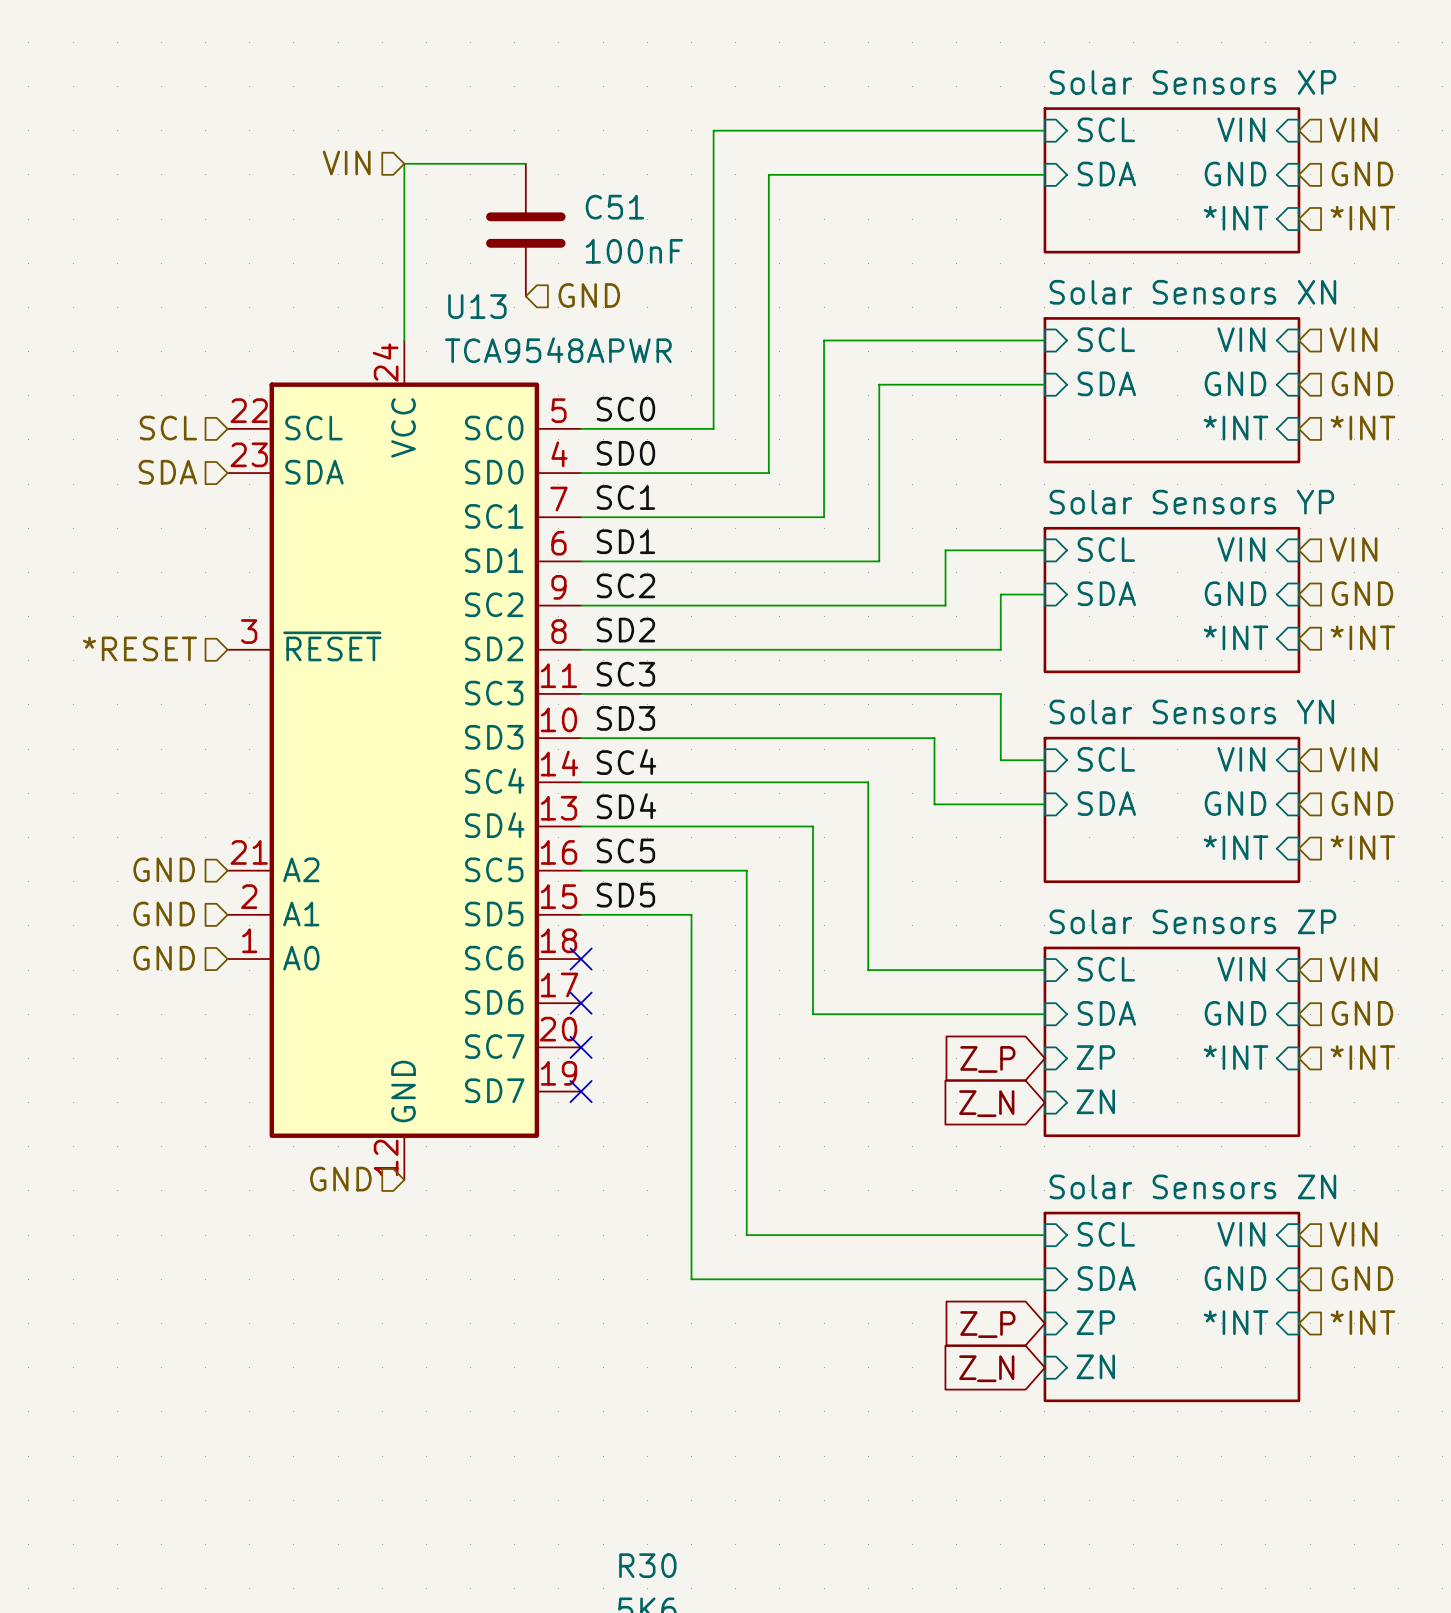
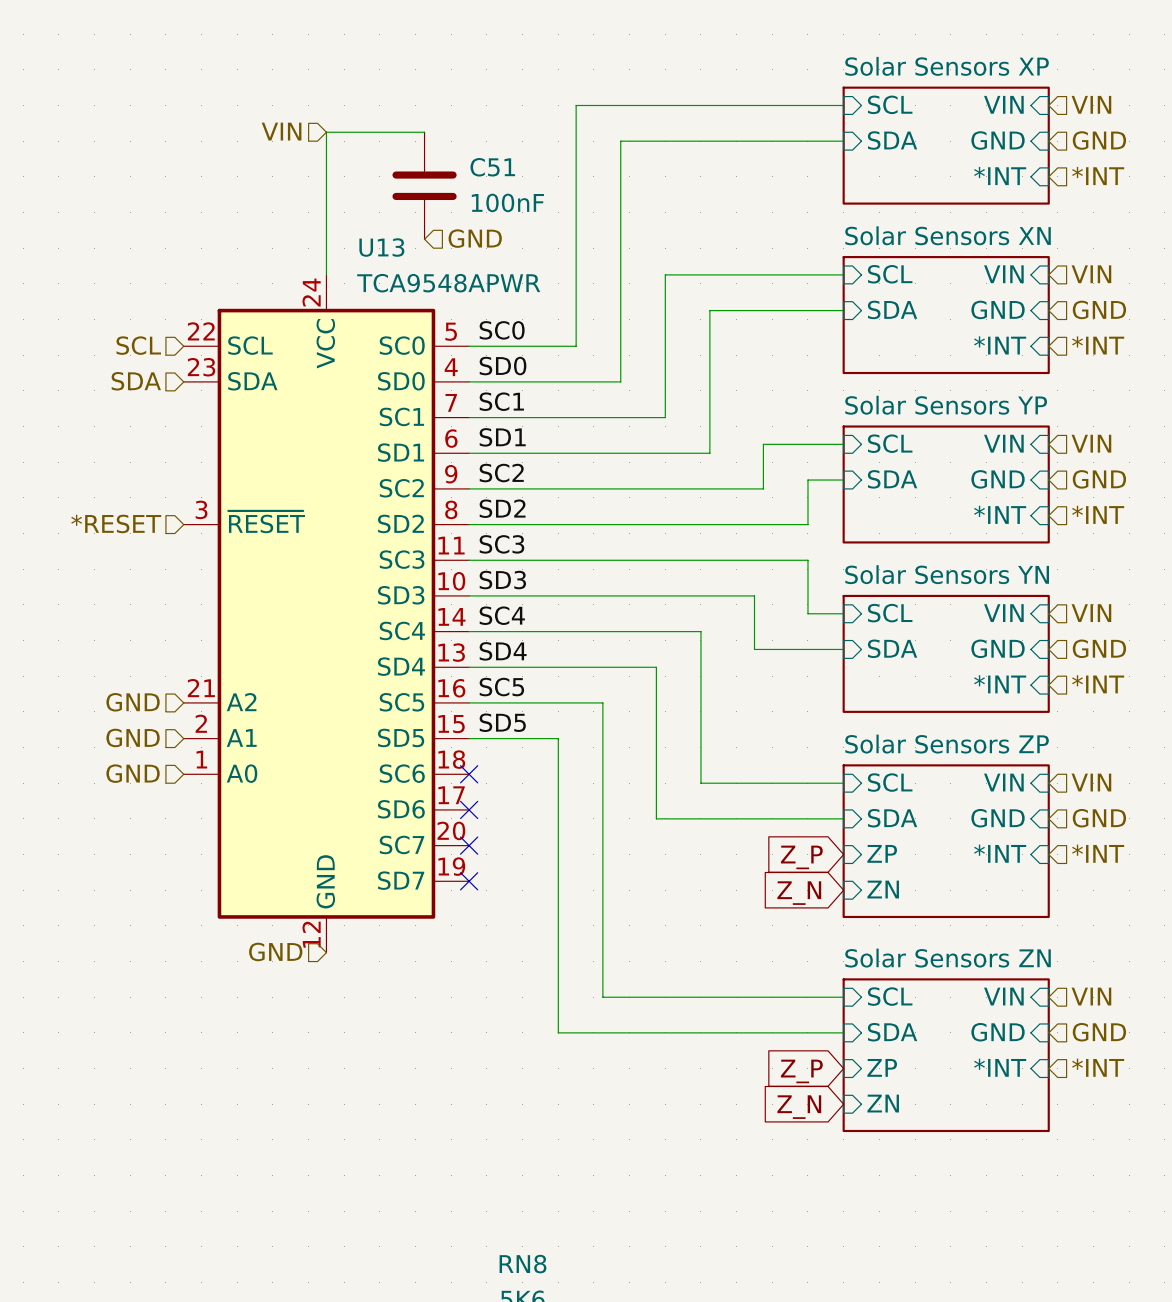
R30 name: R30 (647, 1565) -> RN8 (523, 1264)

